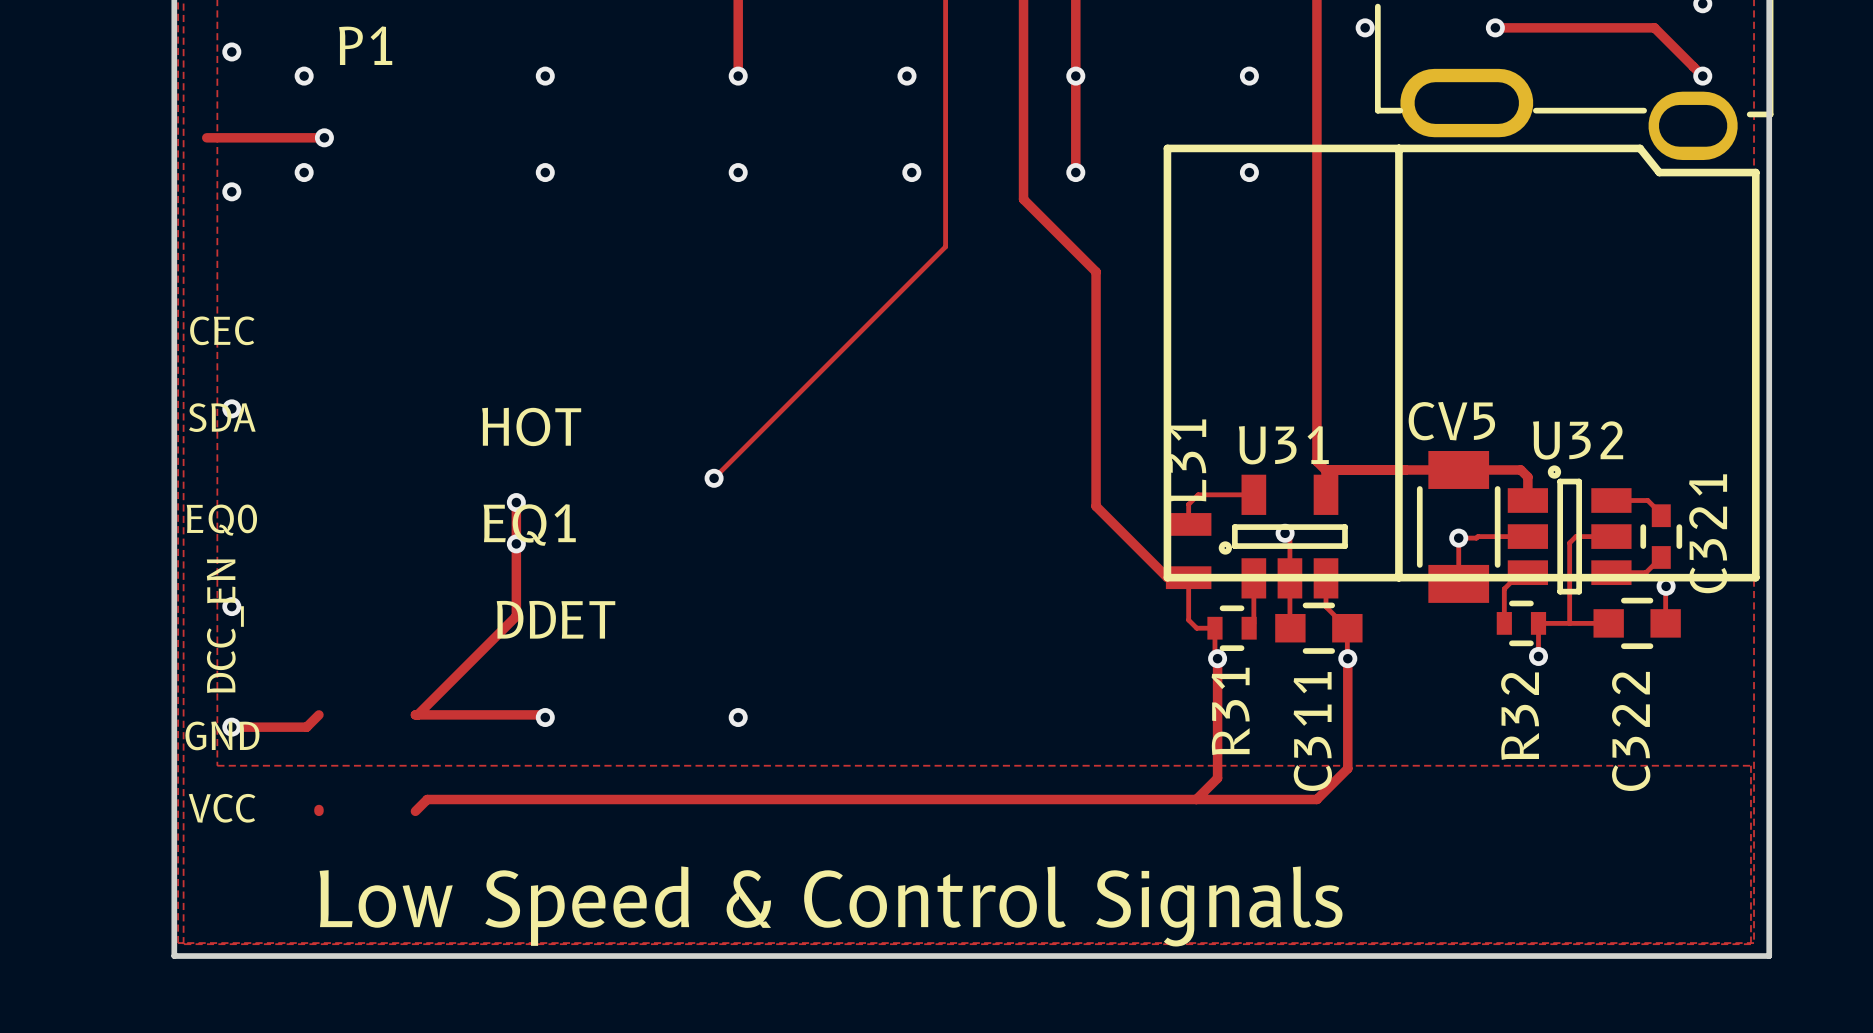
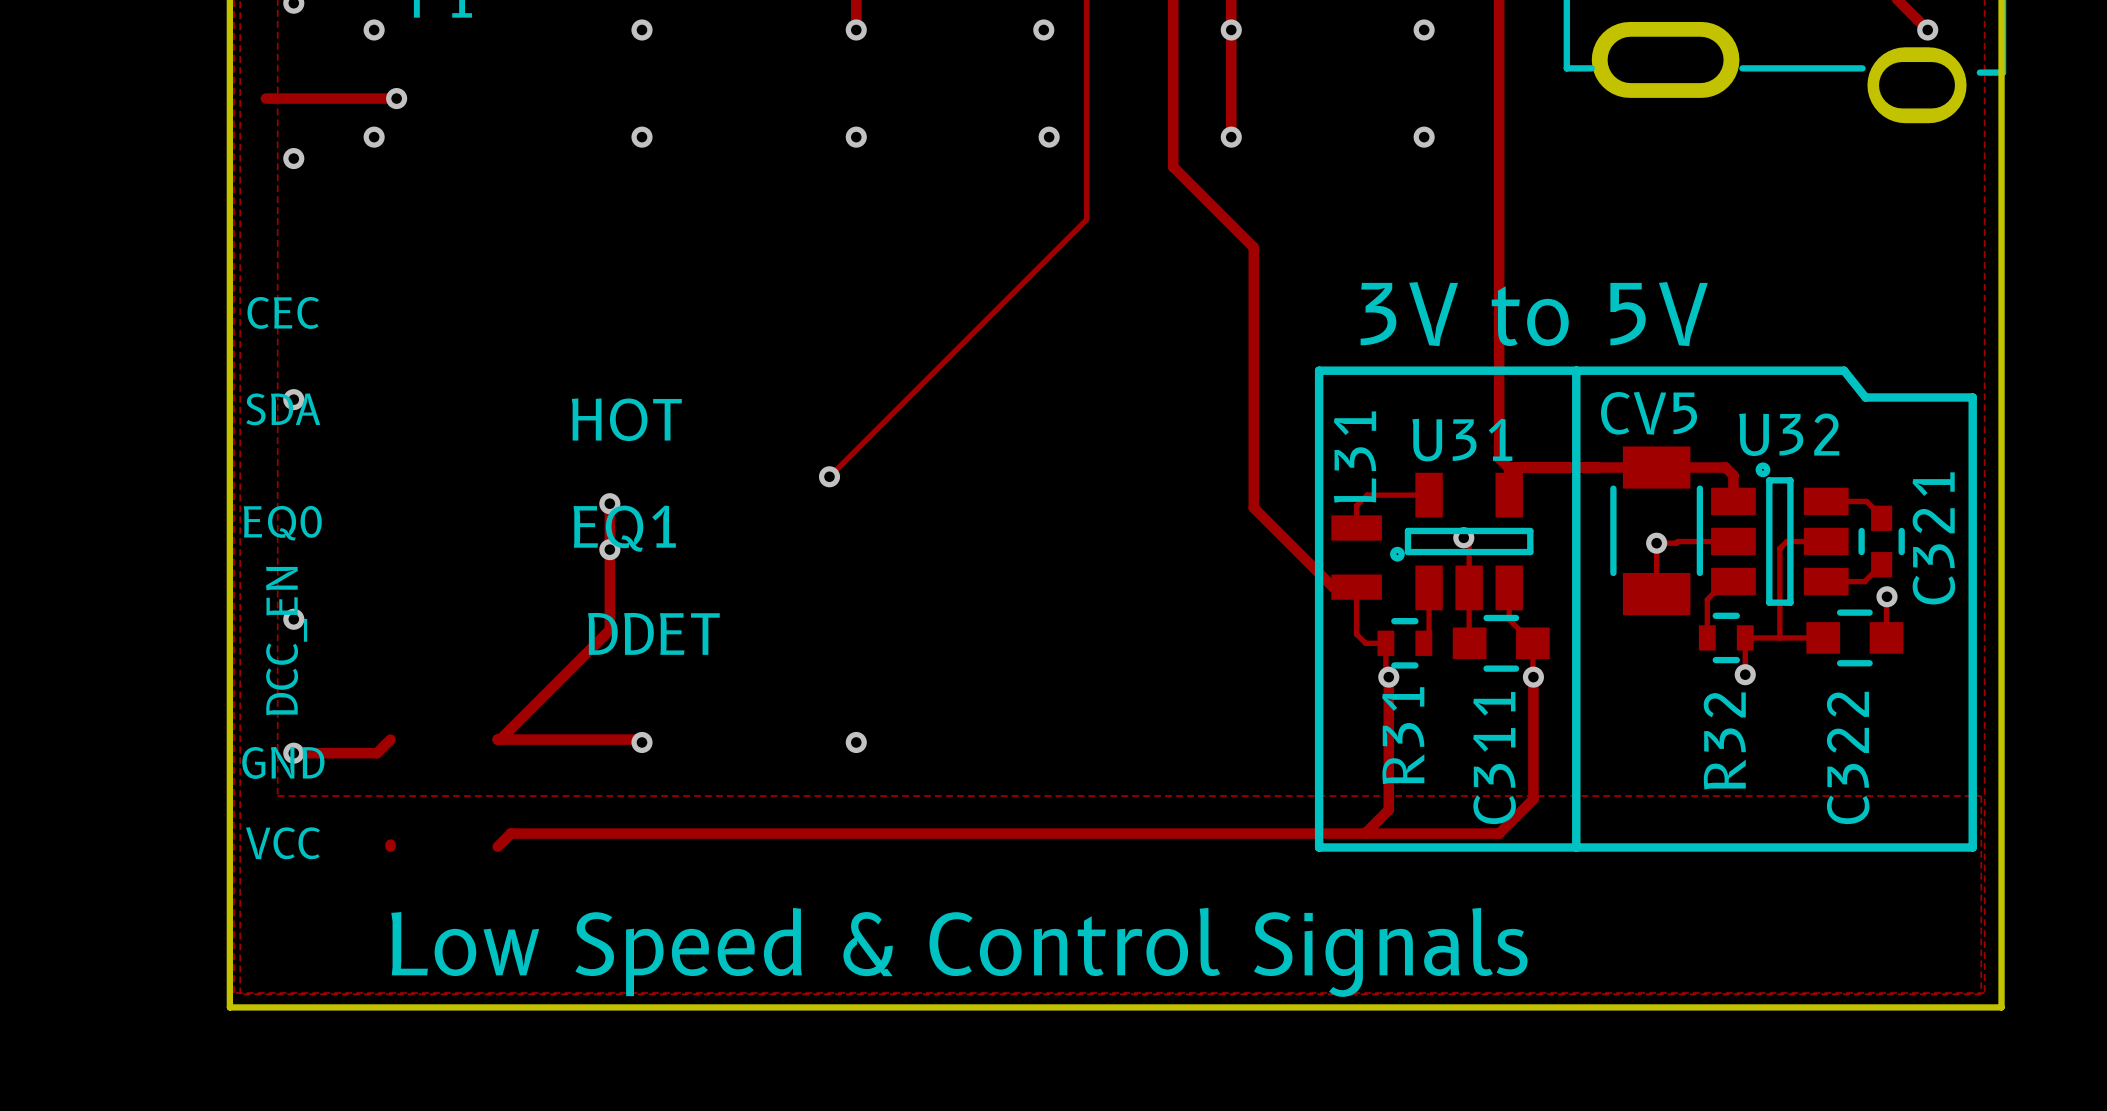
line: (1167, 148) (1167, 577) (1755, 577) (1755, 172) (1659, 172) (1640, 148) (1167, 148) -> (1319, 370) (1319, 847) (1972, 847) (1972, 397) (1865, 397) (1844, 370) (1319, 370)
line: (1398, 148) (1398, 577) -> (1576, 370) (1576, 847)
text: none -> 3V to 5V (1534, 314)

